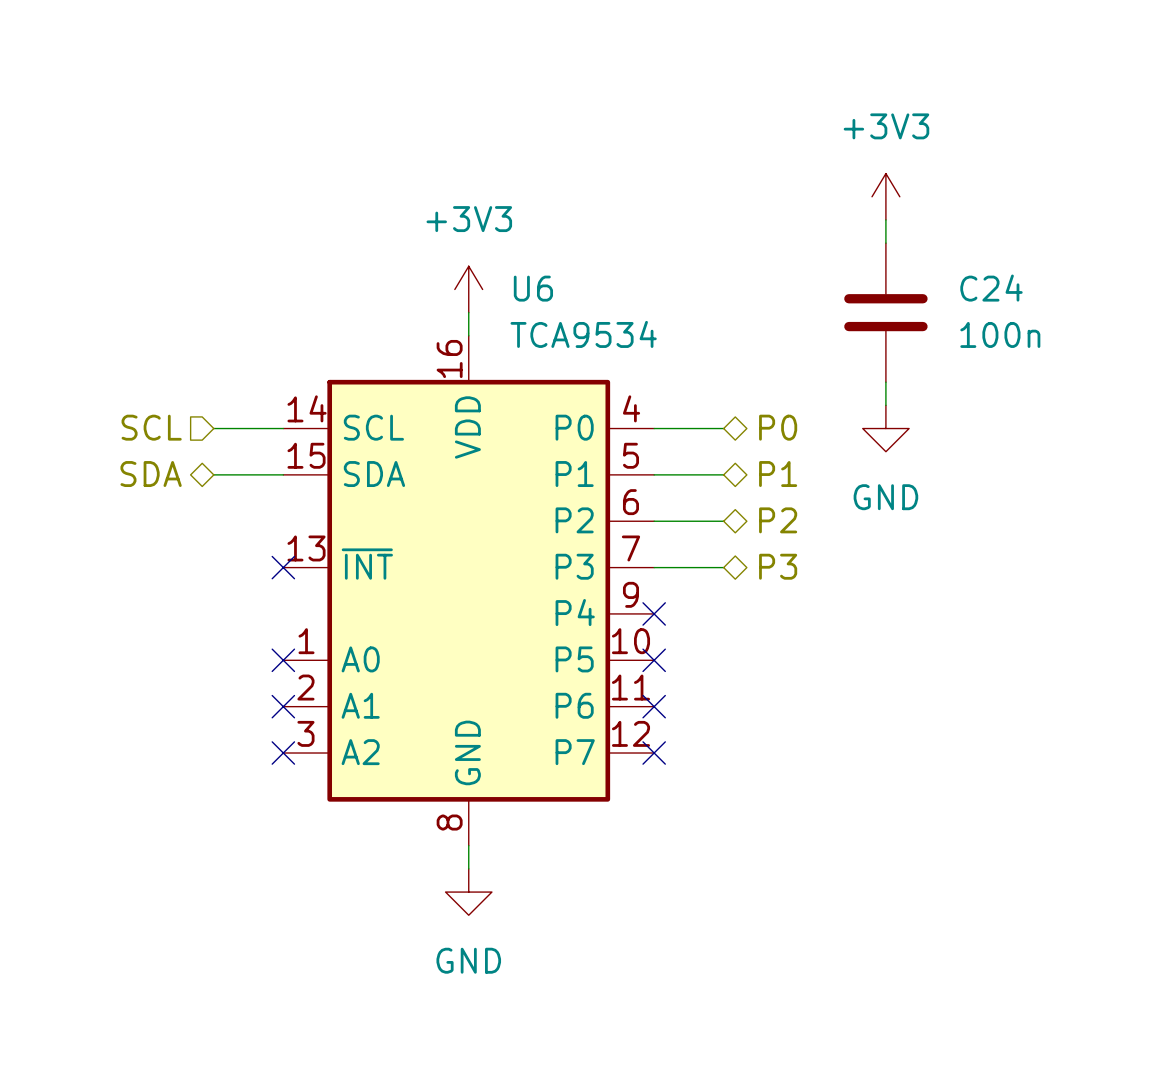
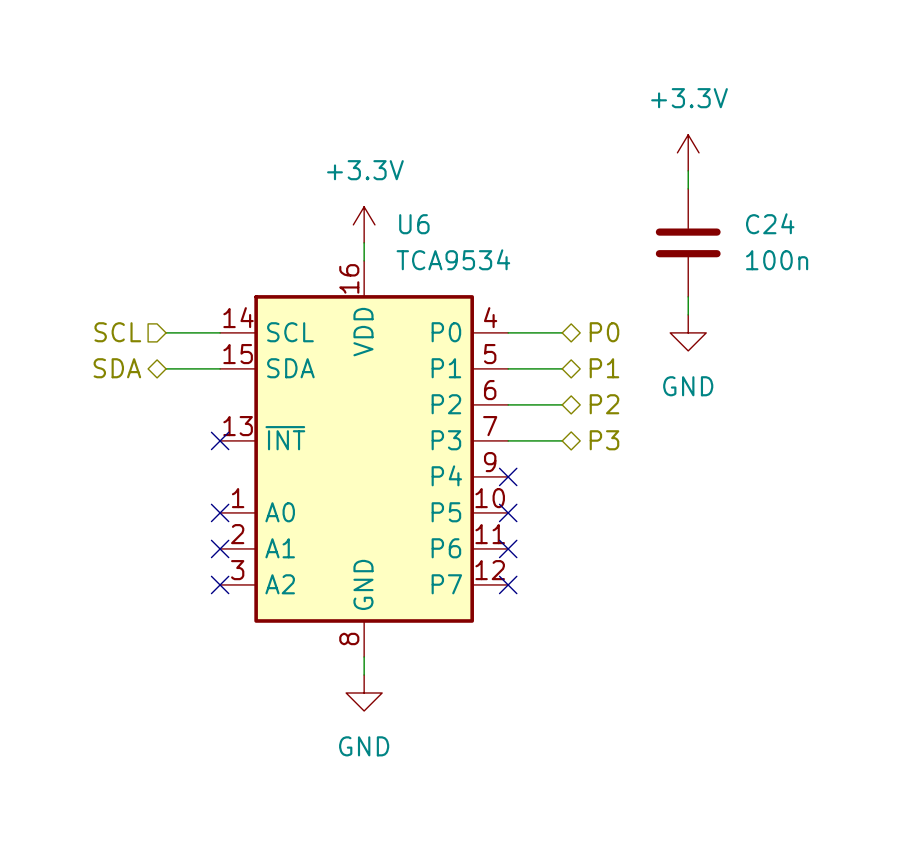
power symbol: +3V3 (885, 196) -> +3.3V (688, 152)
power symbol: +3V3 (468, 289) -> +3.3V (364, 224)

